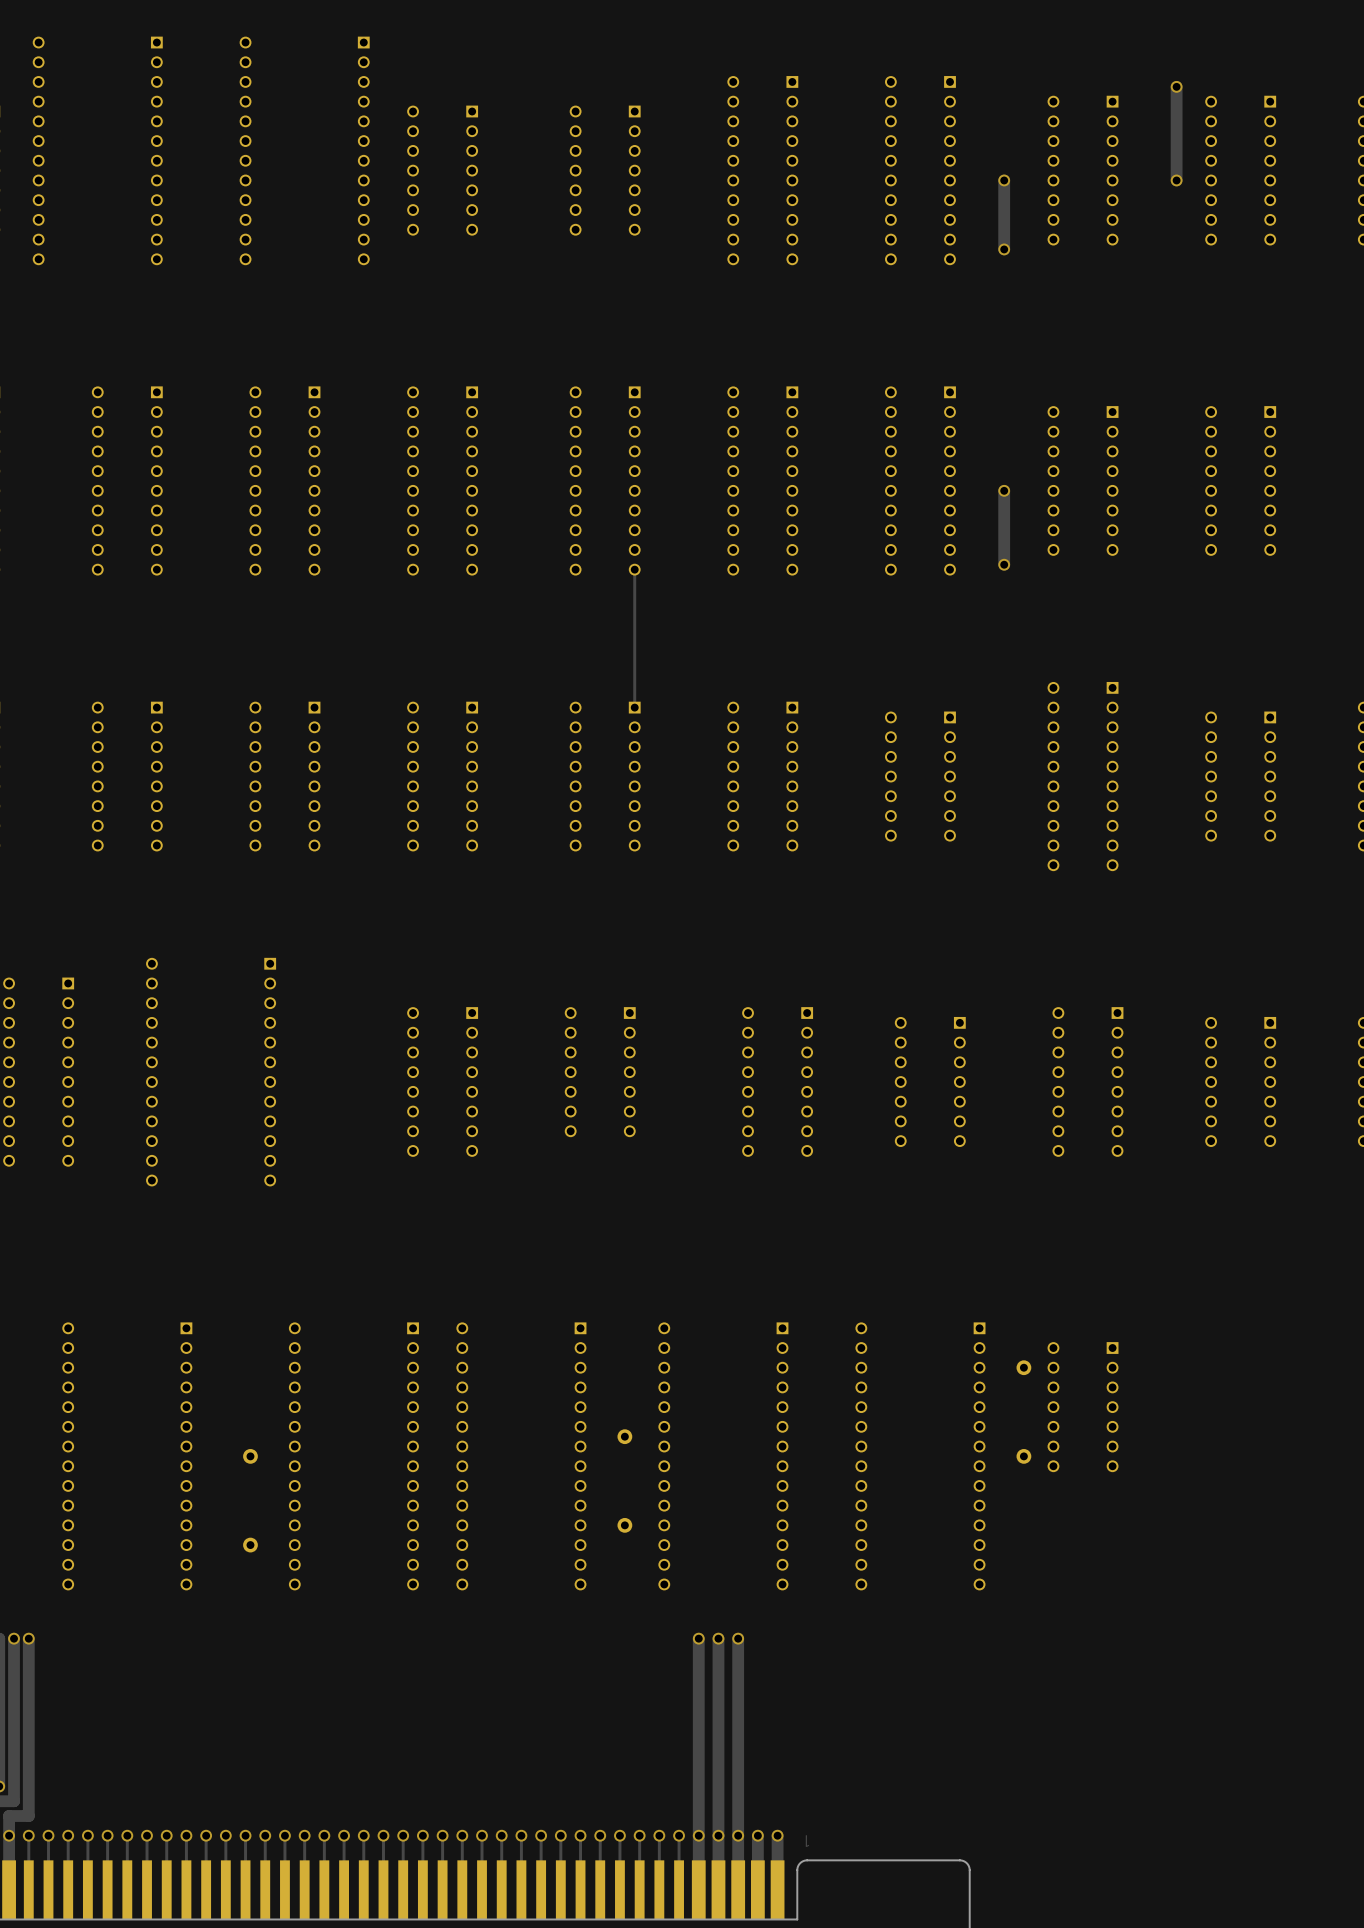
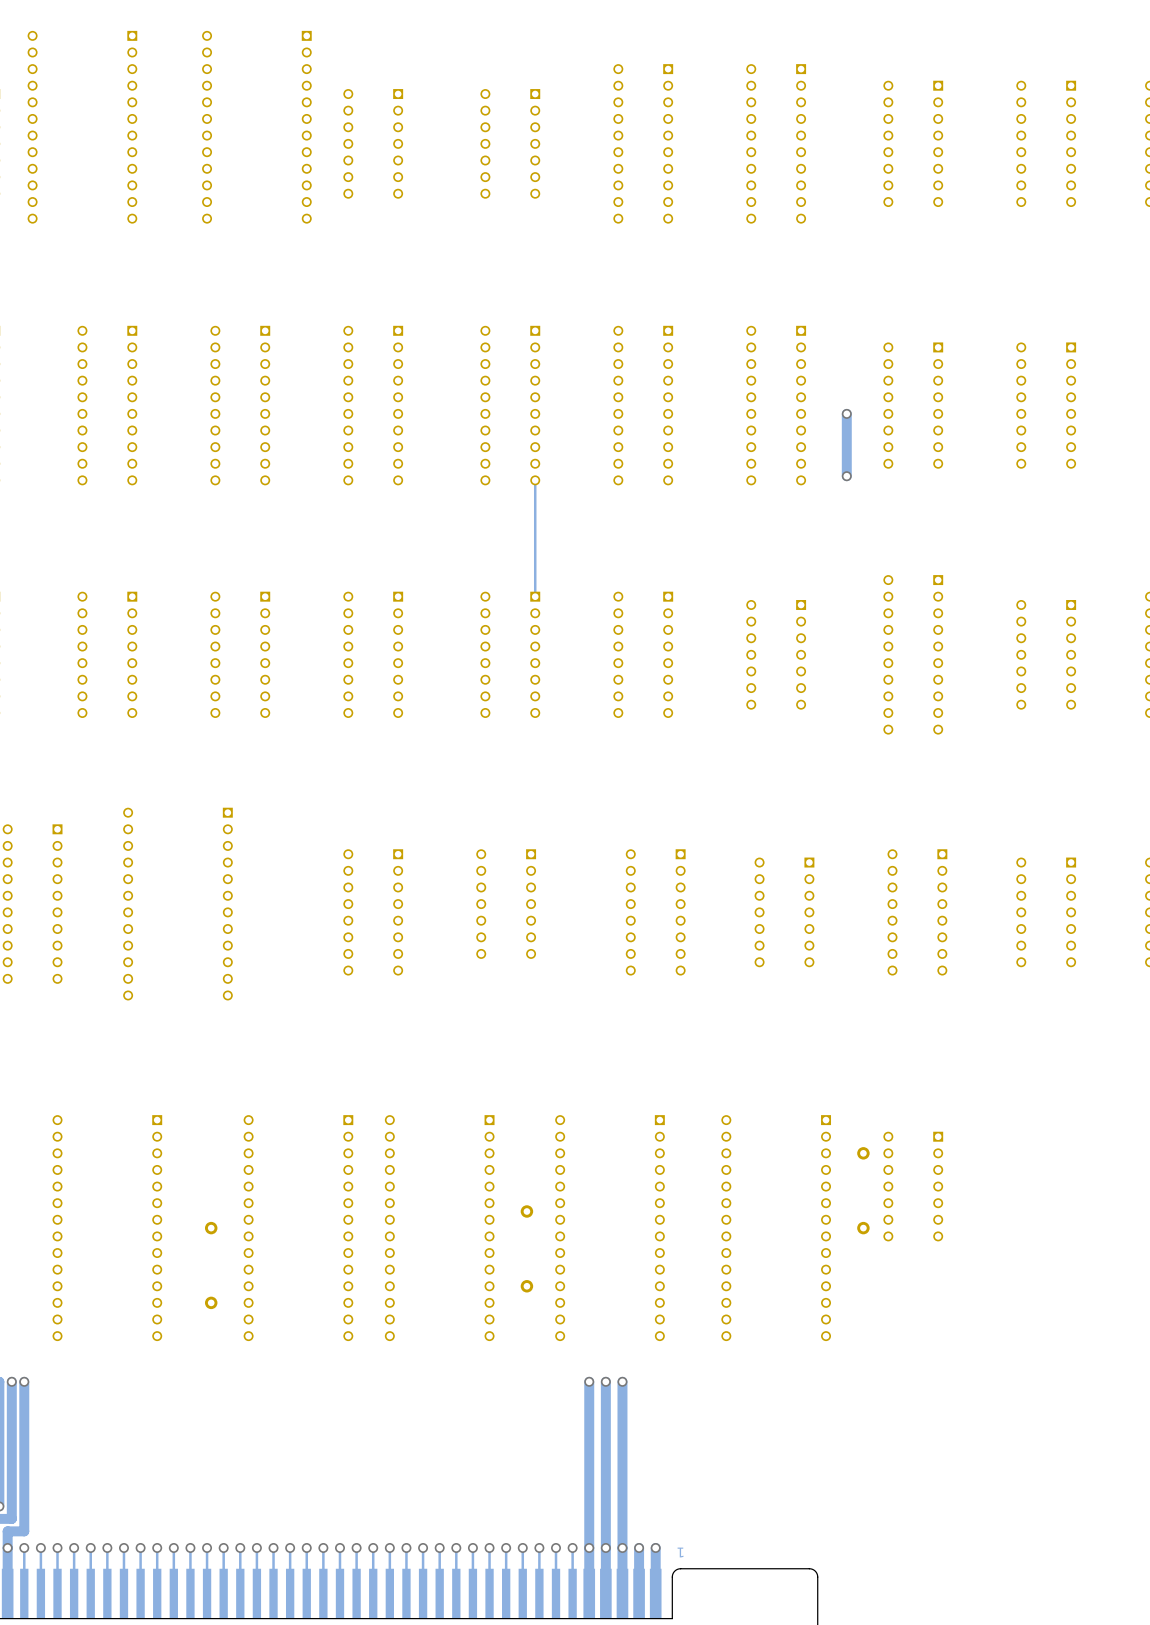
track: (1176, 86) (1176, 180) -> none
via: (1176, 86) -> none
track: (1004, 180) (1004, 249) -> none
via: (1004, 180) -> none
via: (1176, 180) -> none
via: (1004, 249) -> none

